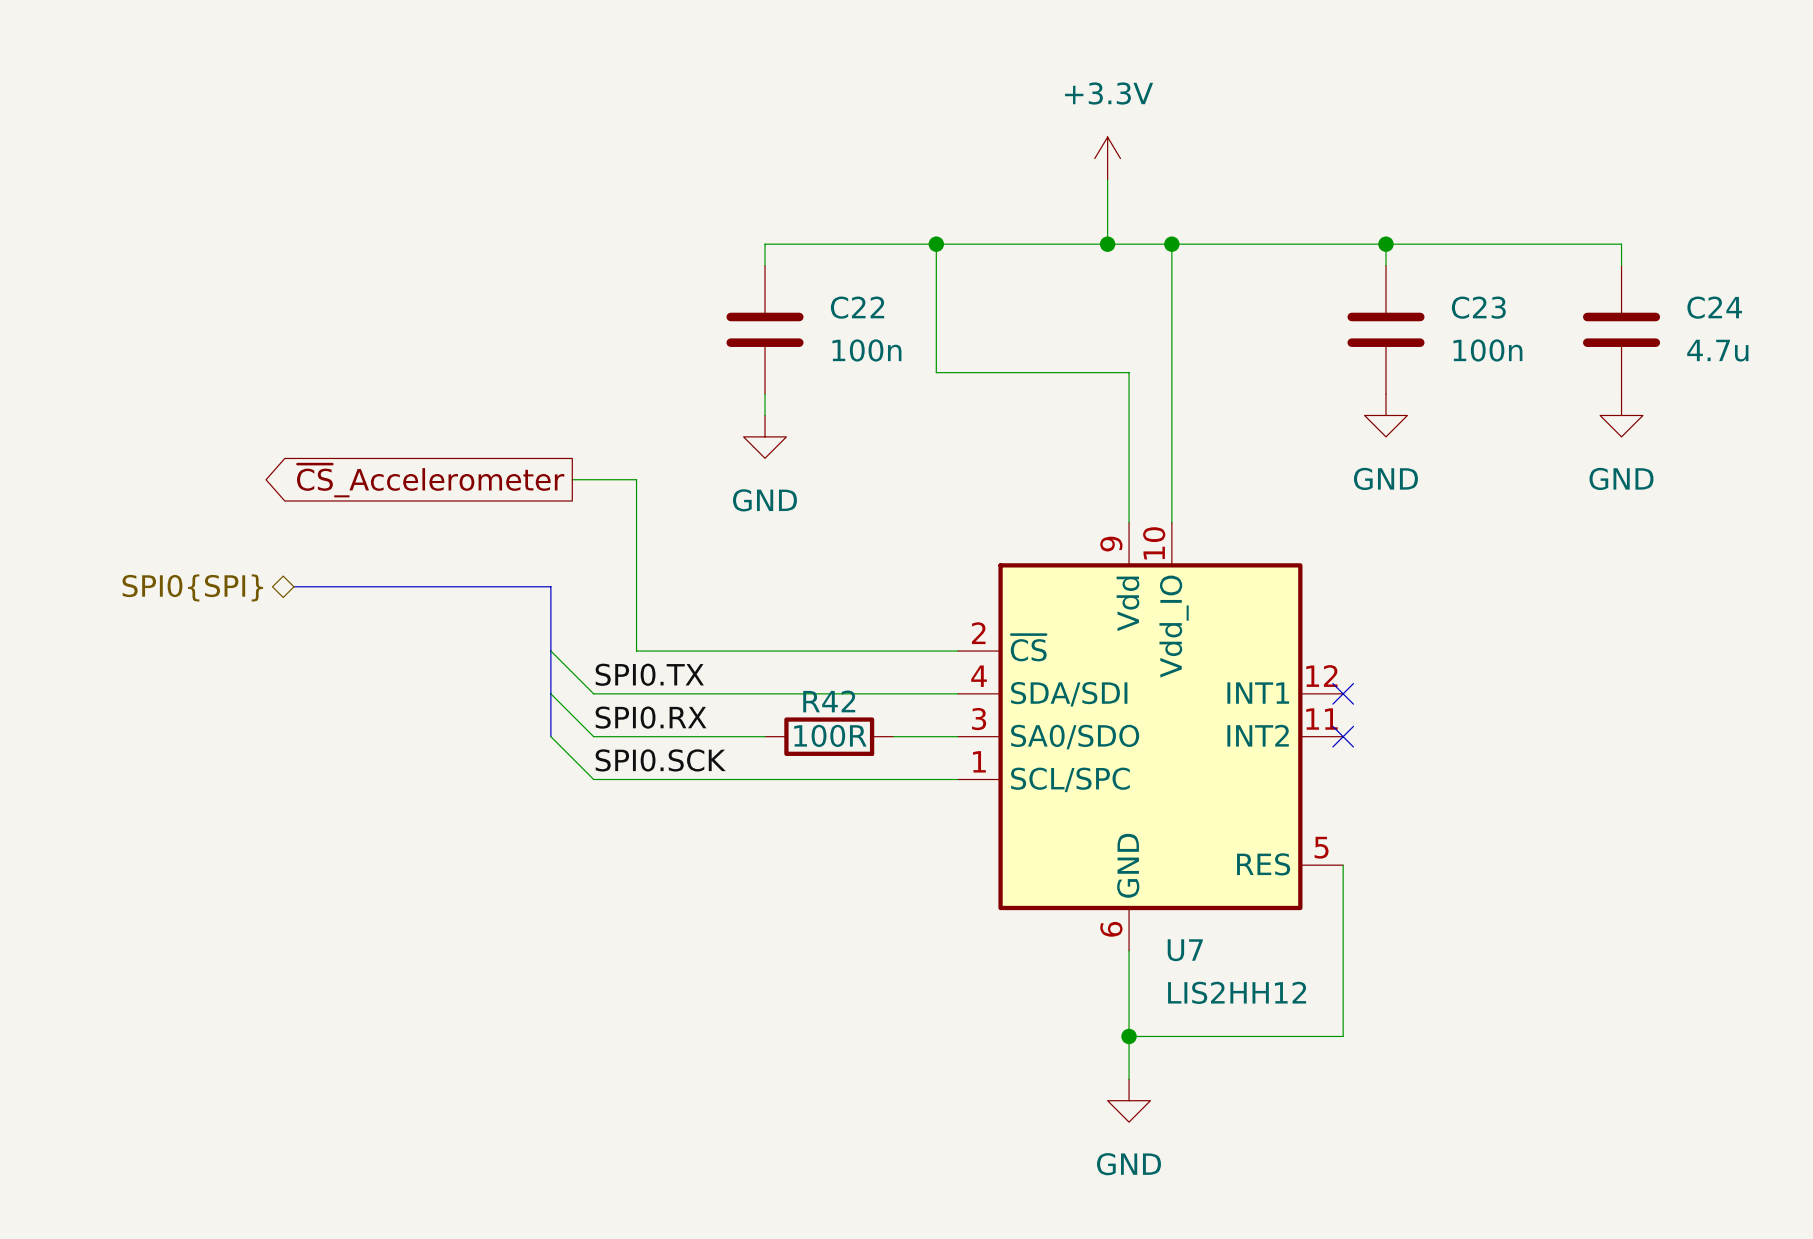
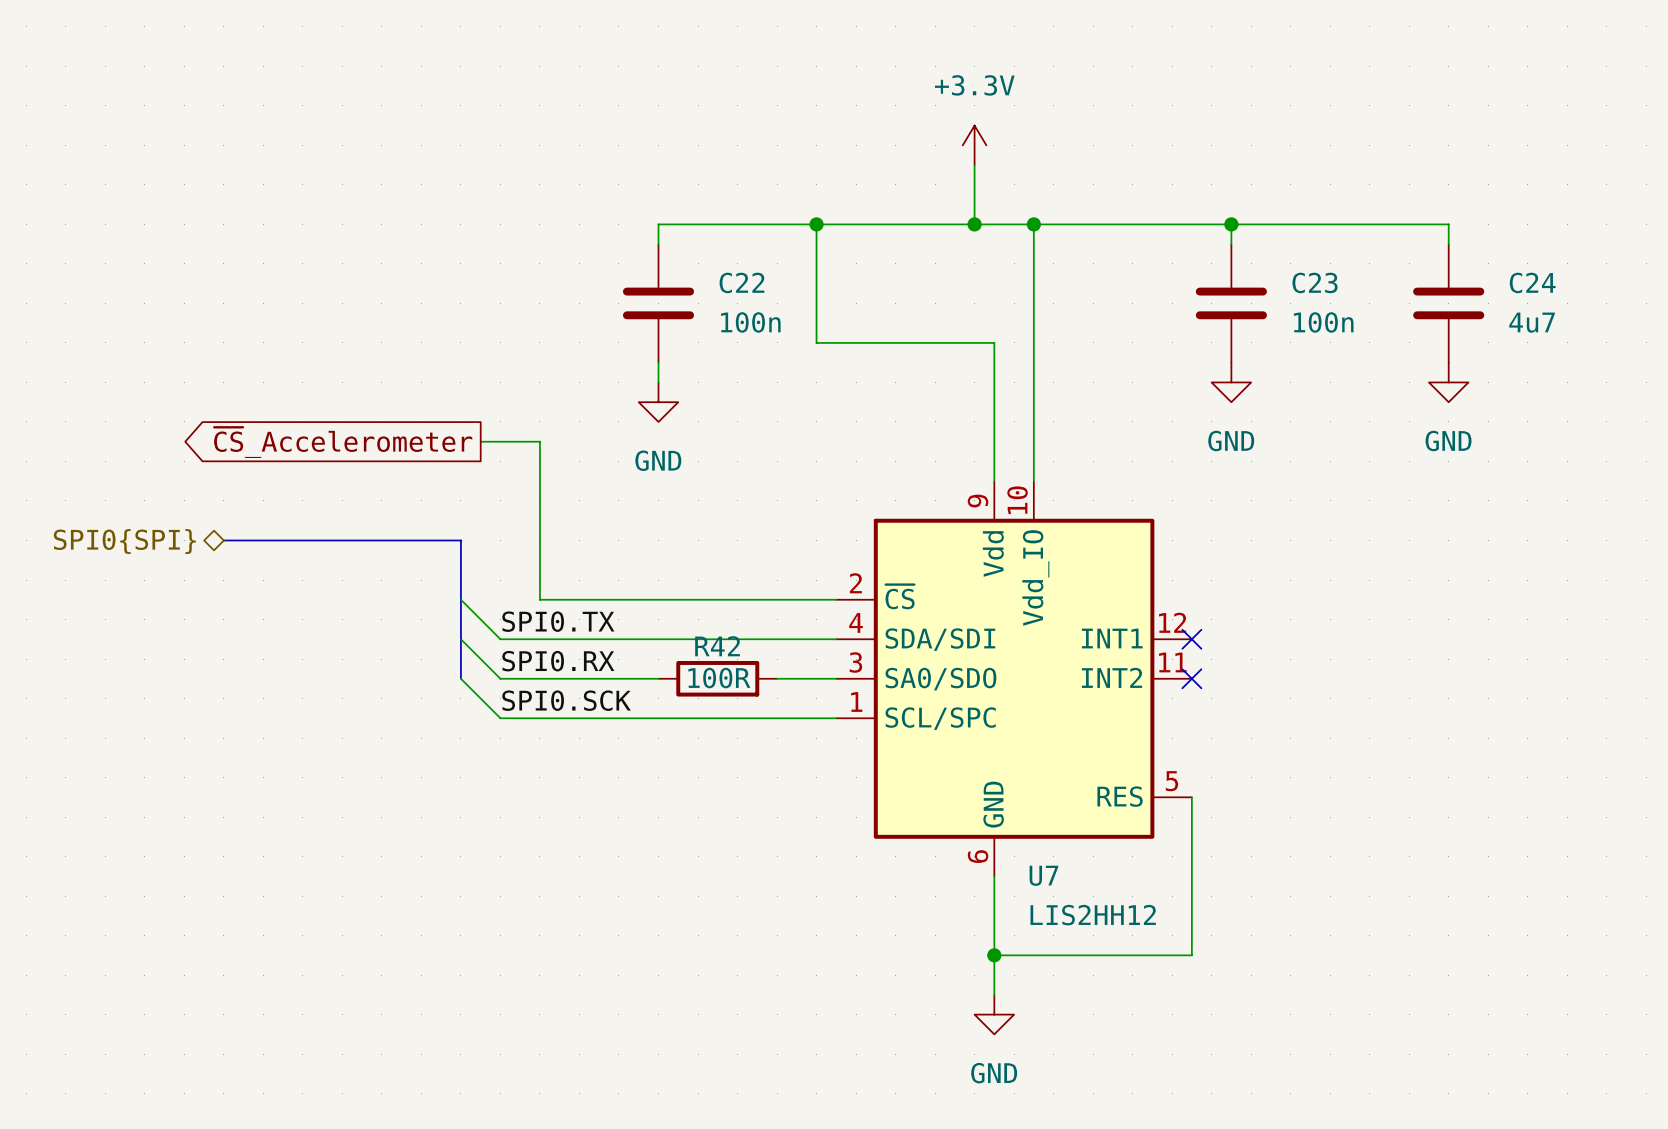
C24 value: 4.7u (1717, 350) -> 4u7 (1532, 322)

